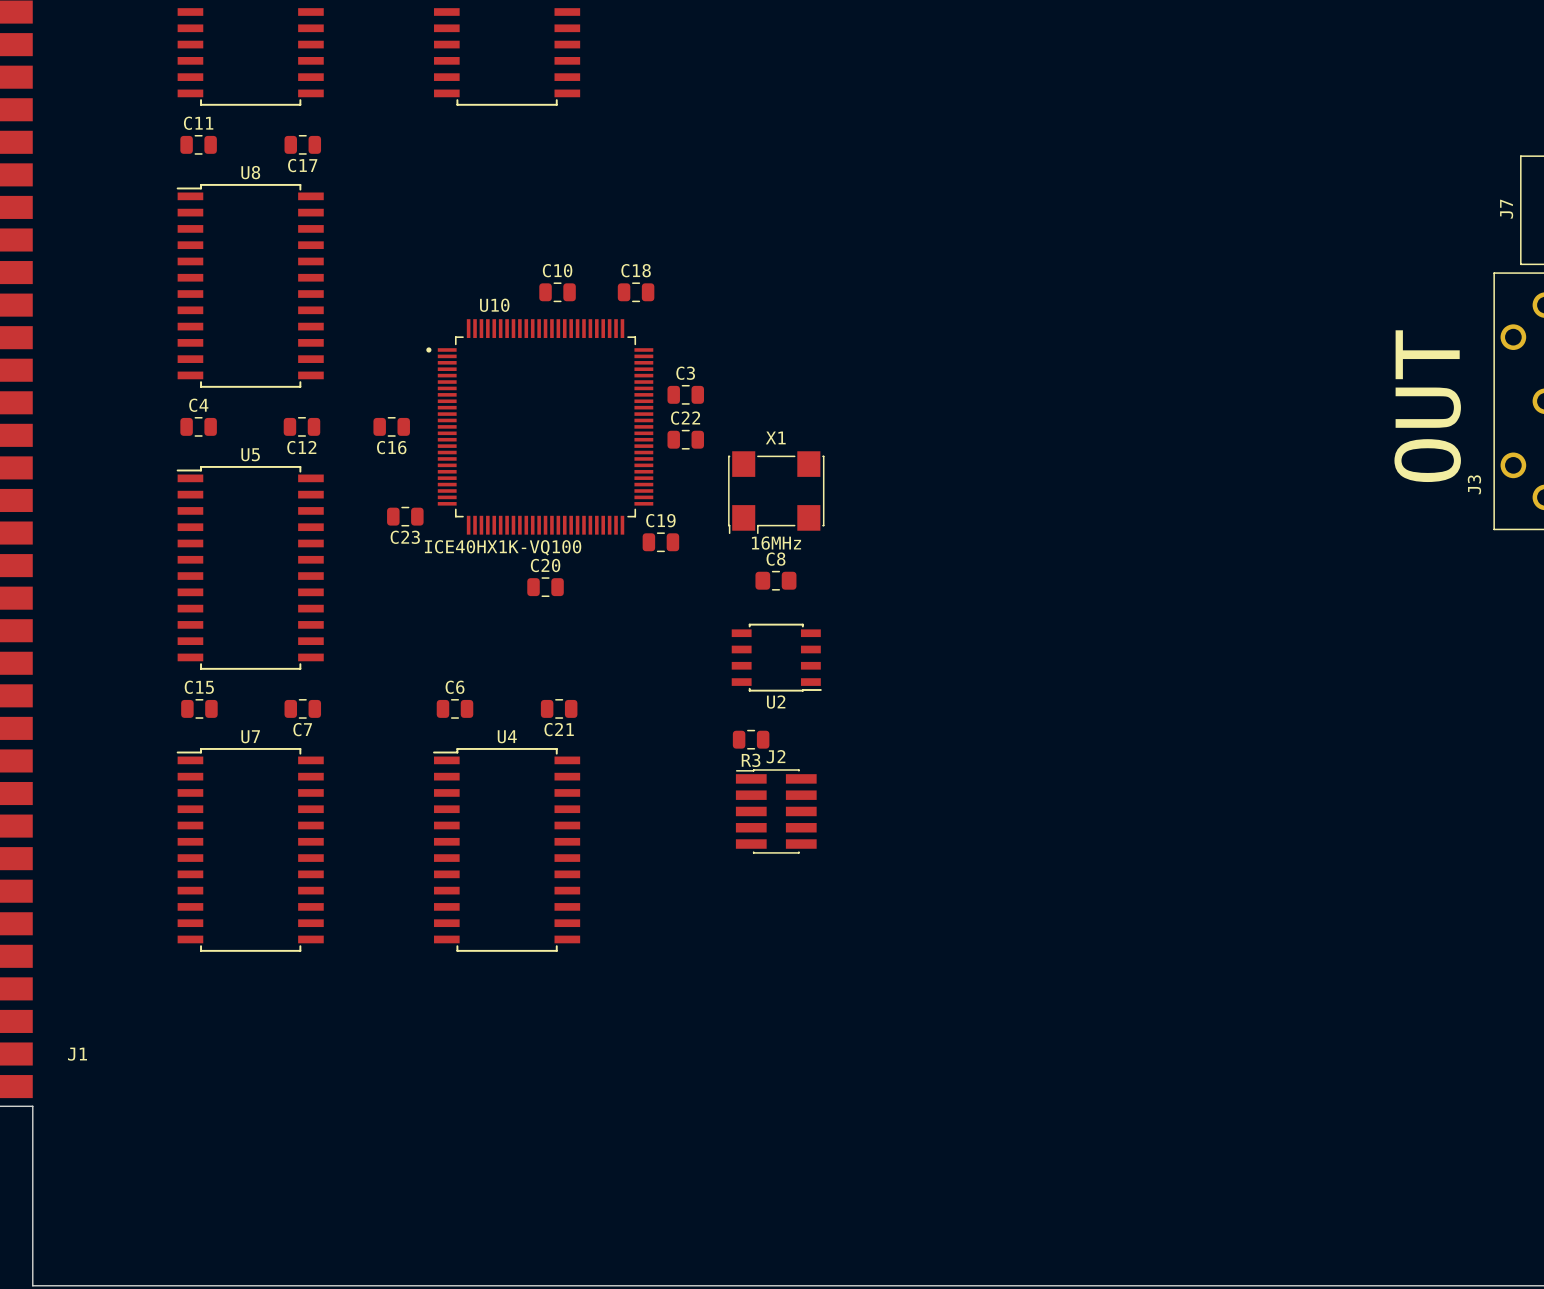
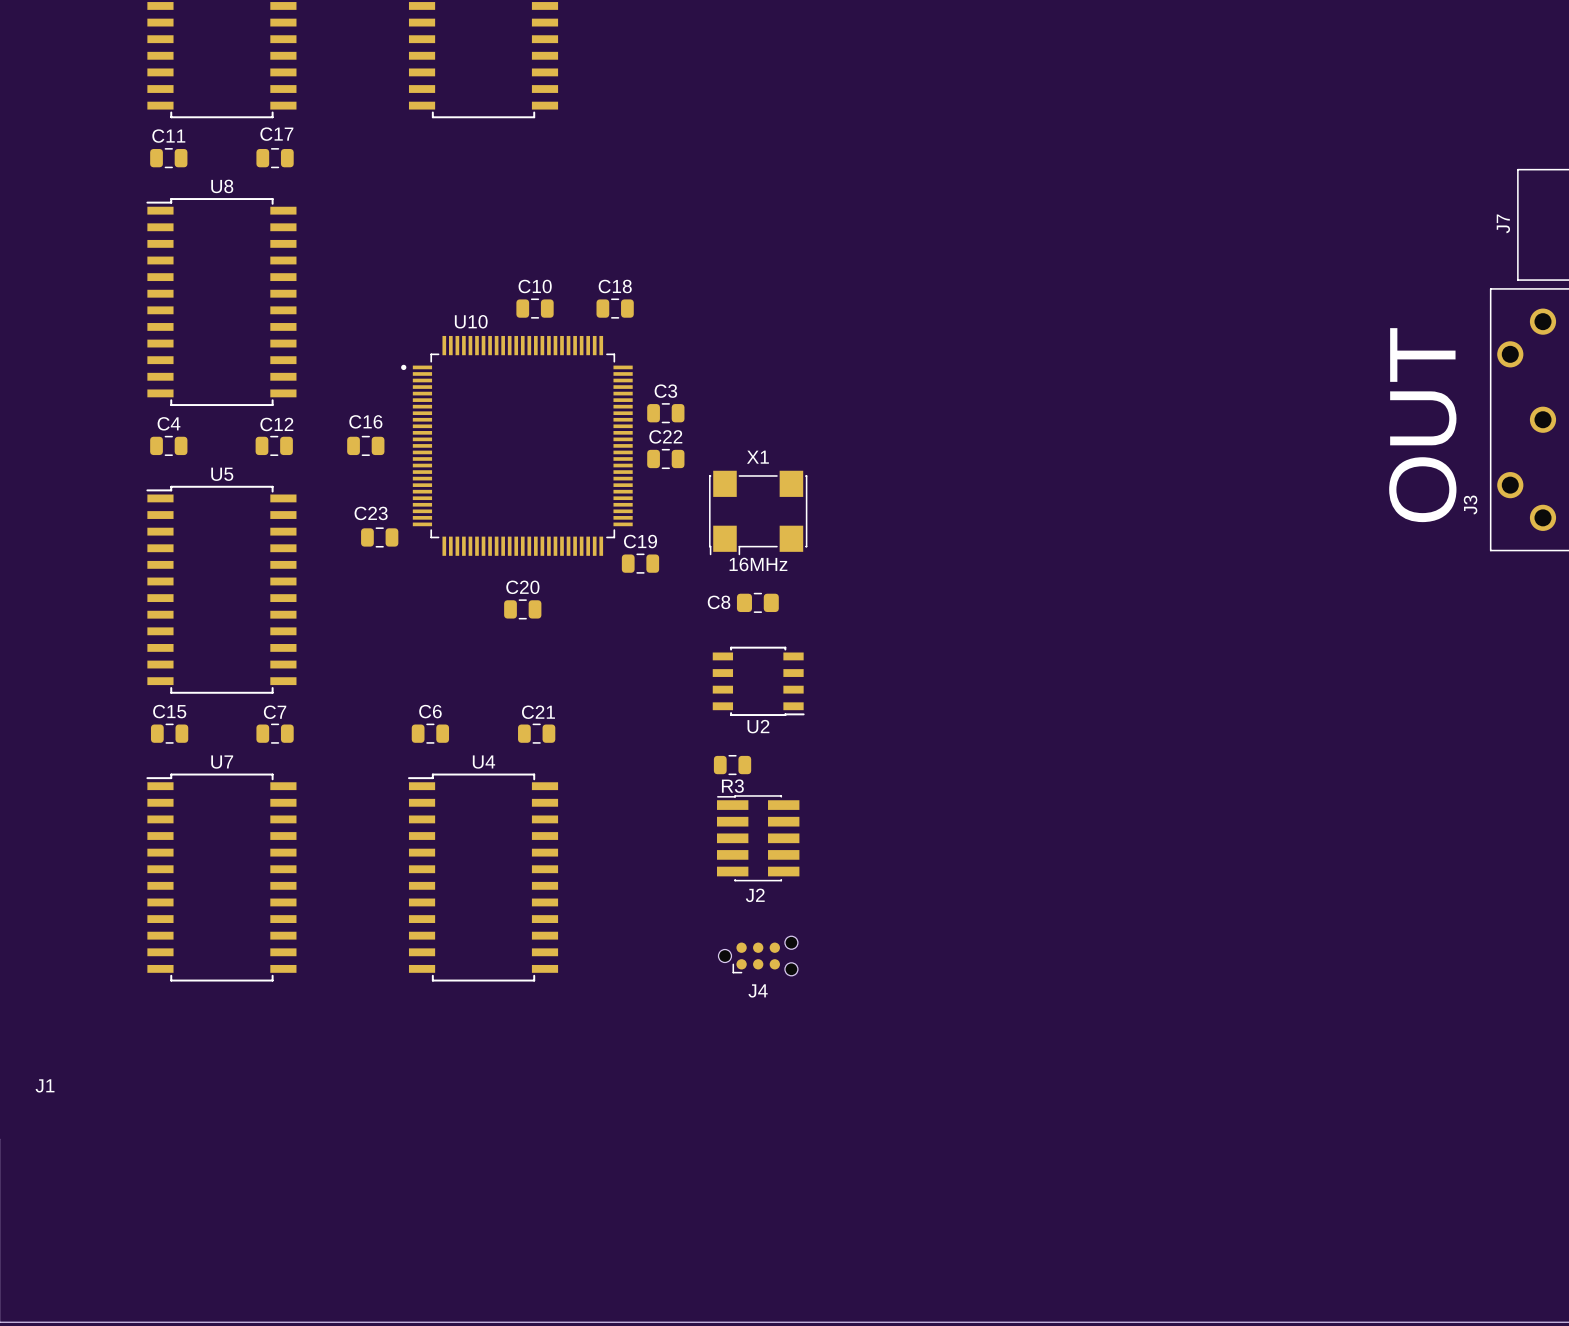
C17 name position: C17 (302, 165) -> C17 (276, 134)
C12 name position: C12 (301, 447) -> C12 (276, 424)
C16 name position: C16 (391, 447) -> C16 (365, 421)
C23 name position: C23 (405, 537) -> C23 (371, 513)
U10 value: ICE40HX1K-VQ100 (503, 547) -> none
C8 name position: C8 (775, 559) -> C8 (719, 602)
C7 name position: C7 (302, 729) -> C7 (275, 712)
C21 name position: C21 (559, 729) -> C21 (538, 712)
J2 name position: J2 (776, 756) -> J2 (755, 895)
J4: none -> (758, 956)

